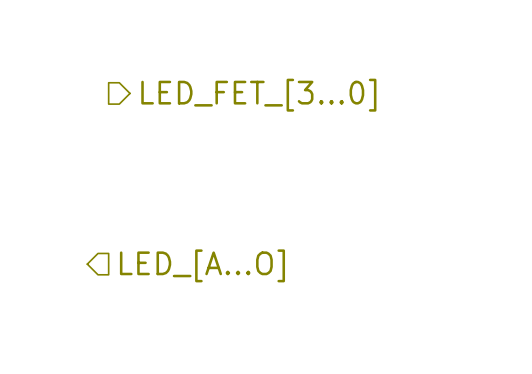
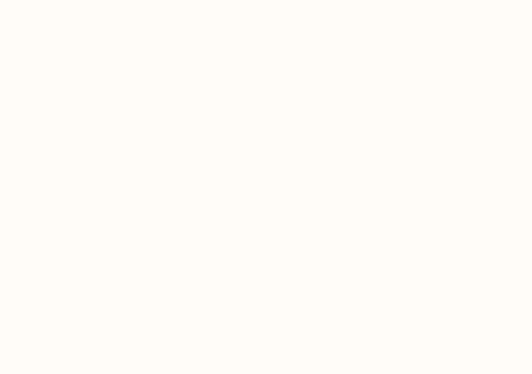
hierarchical label: LED_FET_[3...0] (258, 95) -> none
hierarchical label: LED_[A...O] (202, 265) -> none

